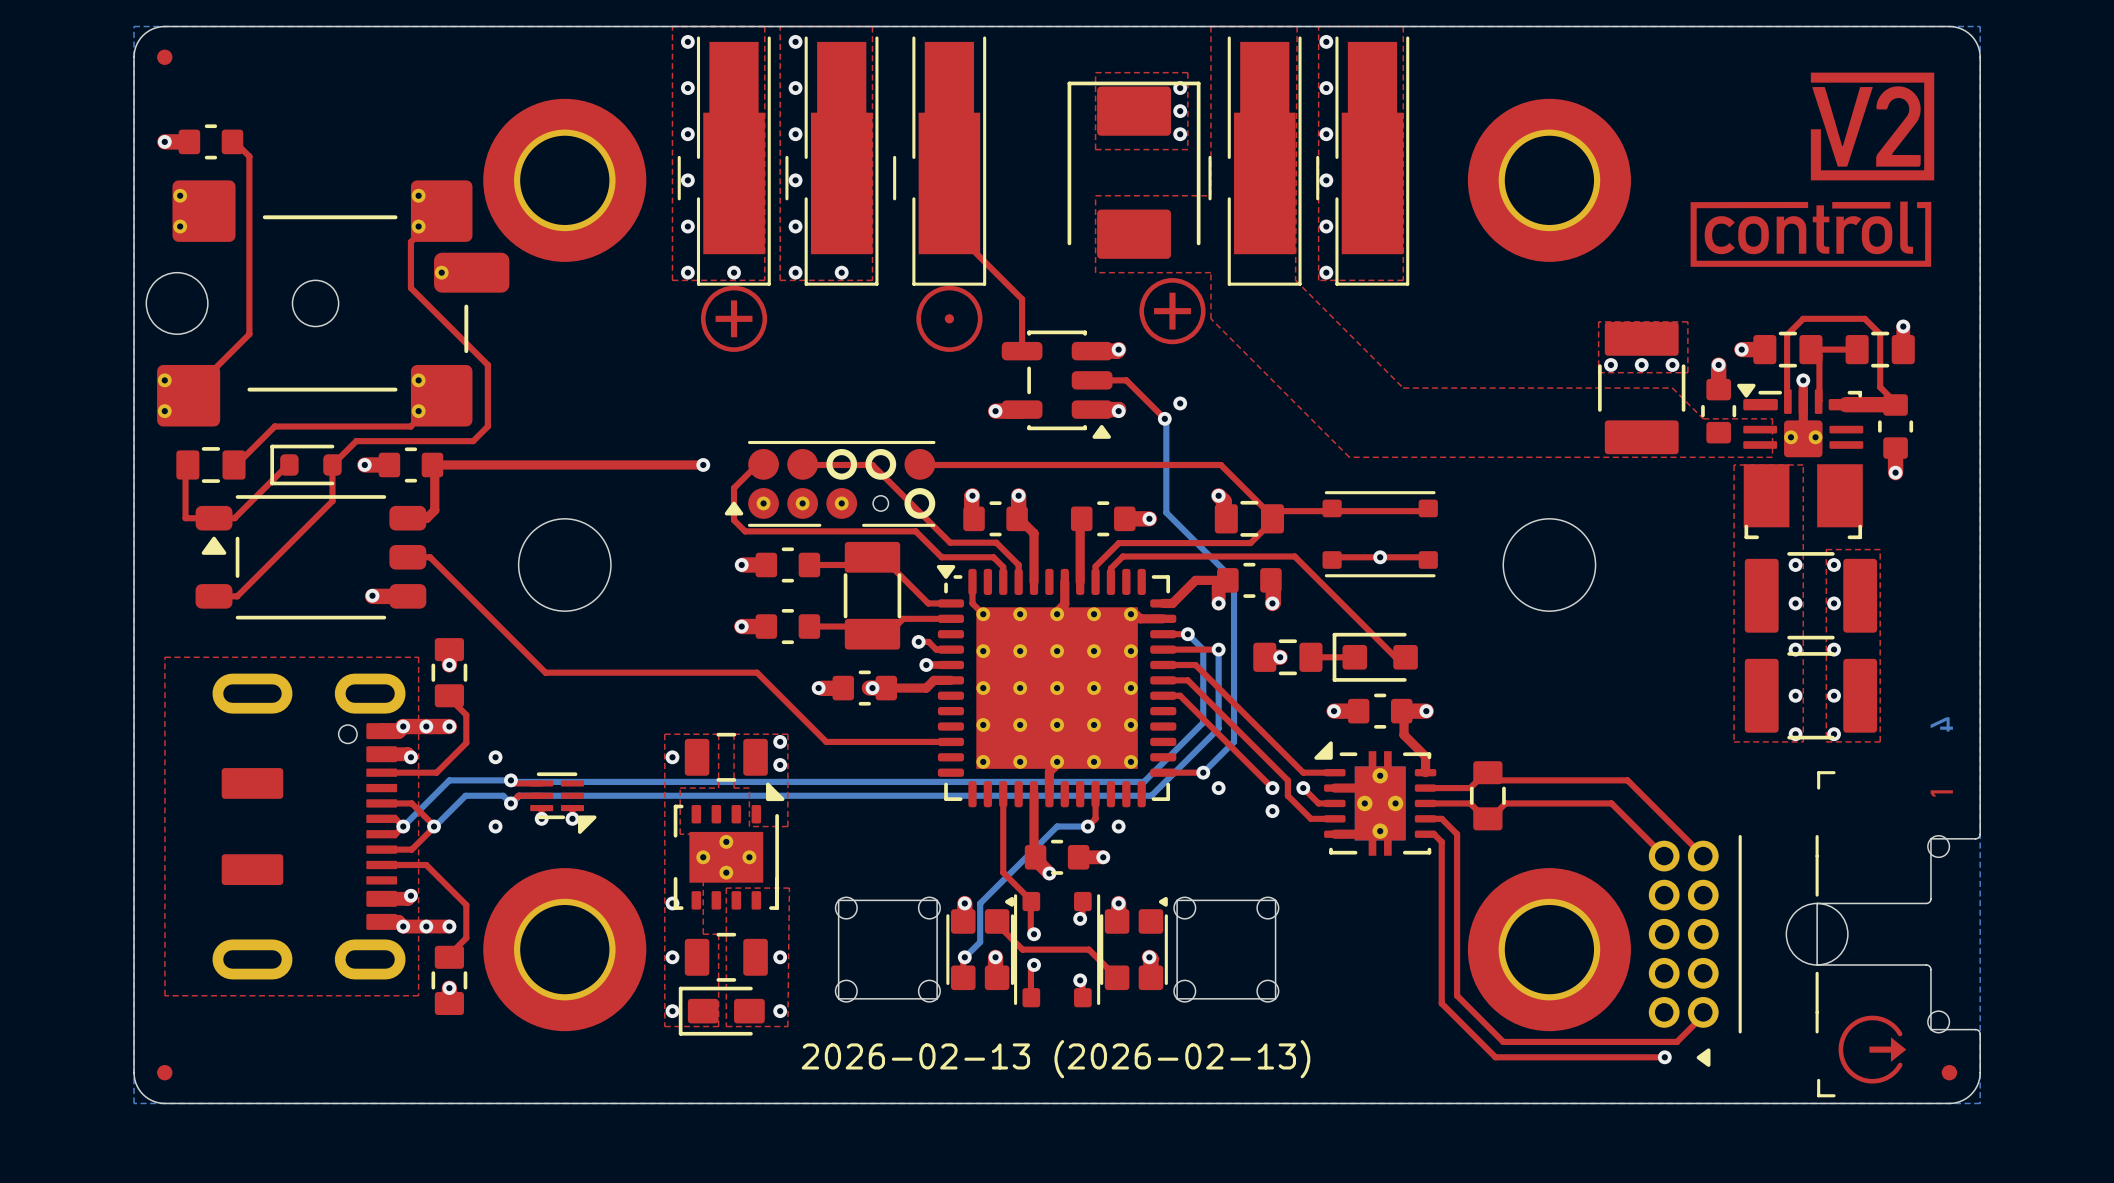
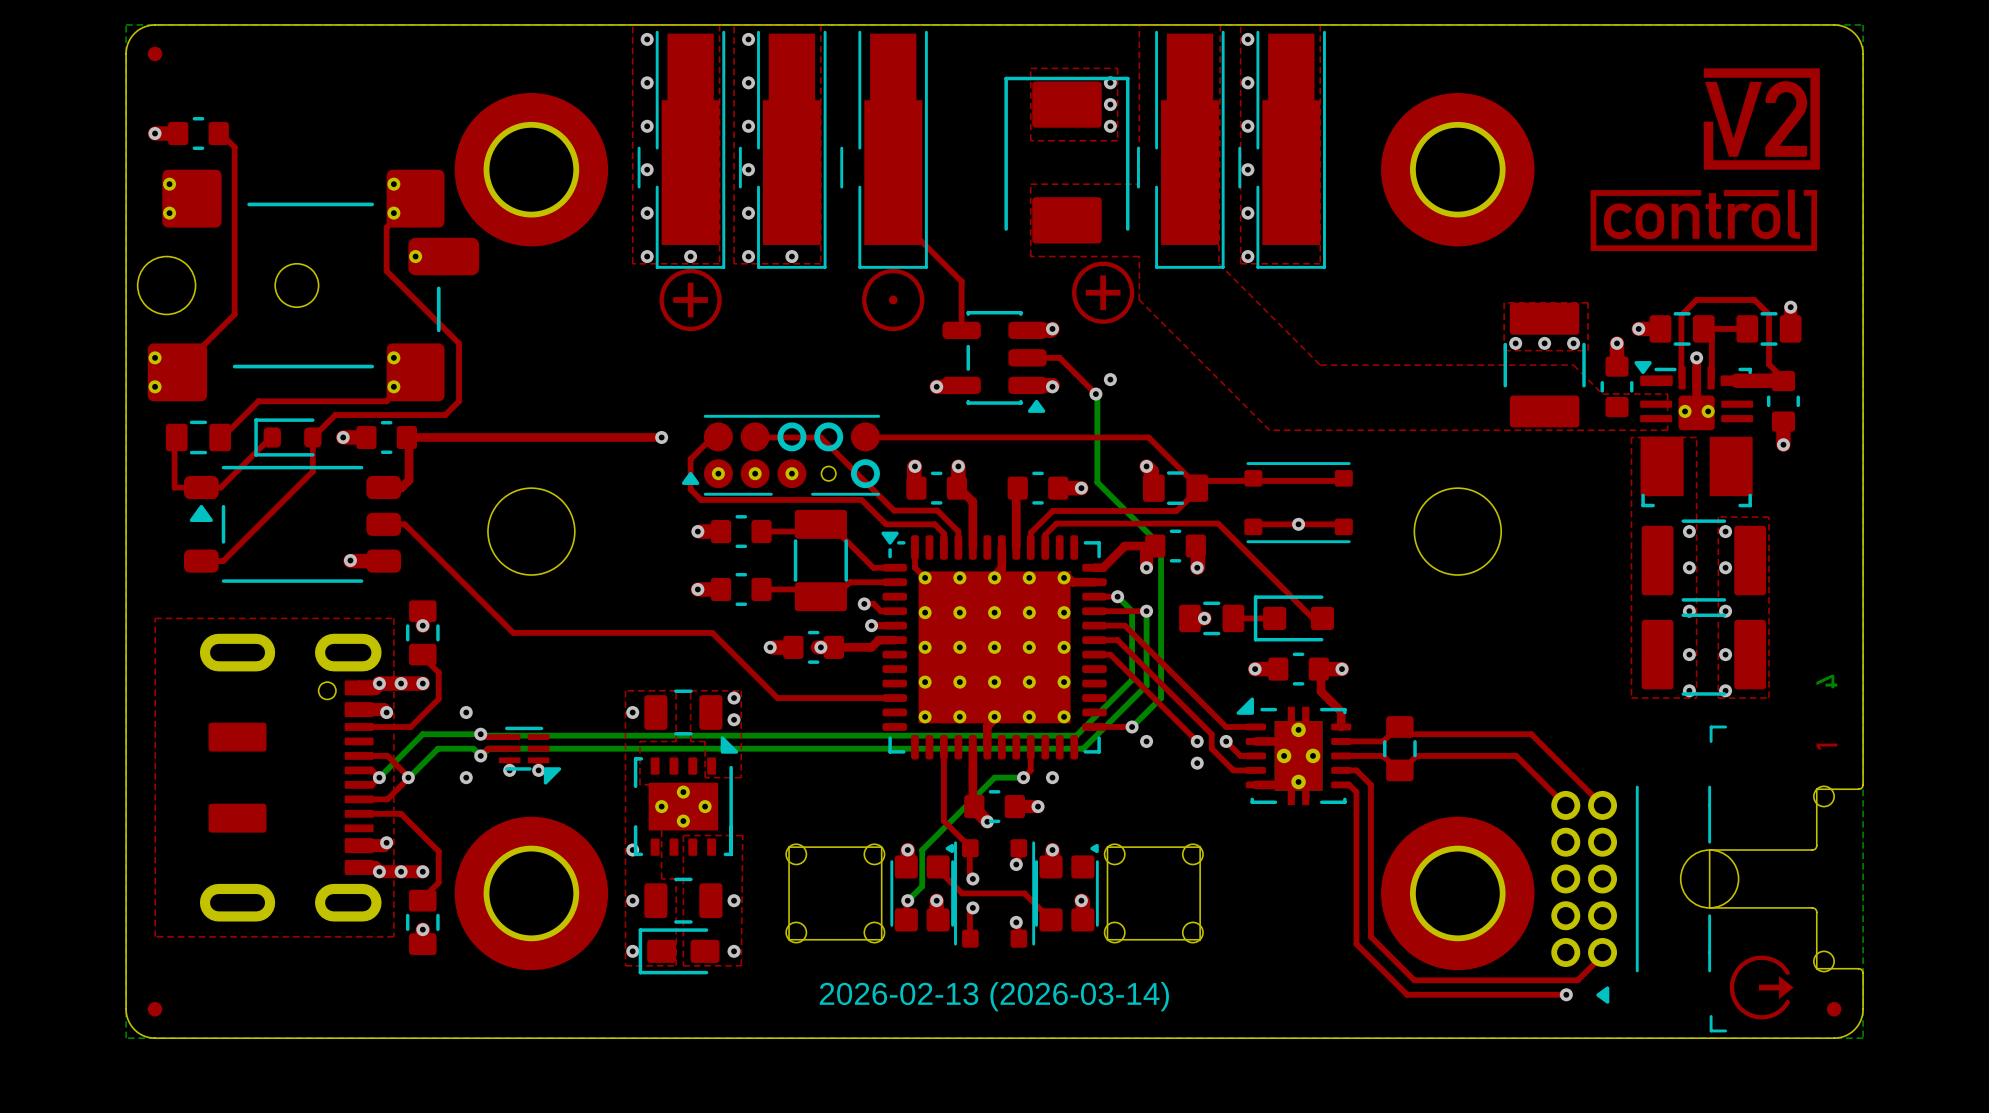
part footprint: [677, 36, 771, 286] -> [637, 30, 726, 269]
part footprint: [785, 36, 879, 286] -> [738, 30, 827, 269]
part footprint: [893, 36, 987, 286] -> [840, 30, 928, 269]
part footprint: [1208, 36, 1302, 286] -> [1137, 30, 1225, 269]
part footprint: [1316, 36, 1410, 286] -> [1238, 30, 1326, 269]
drawing shape: [801, 1040, 1311, 1079] -> [819, 981, 1169, 1012]

